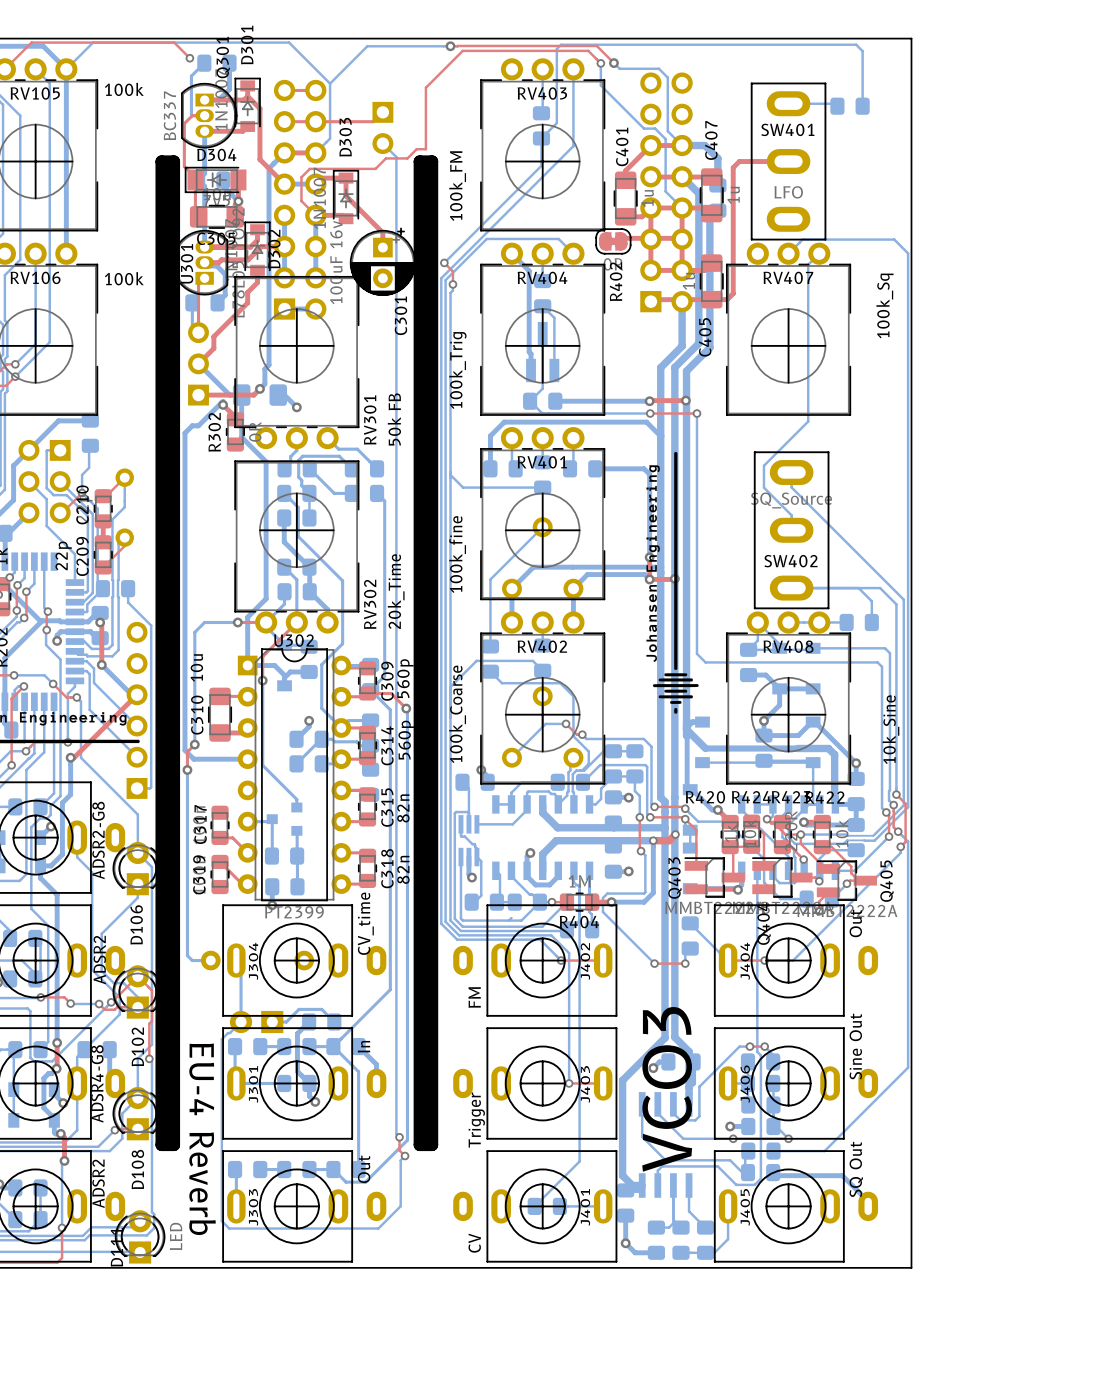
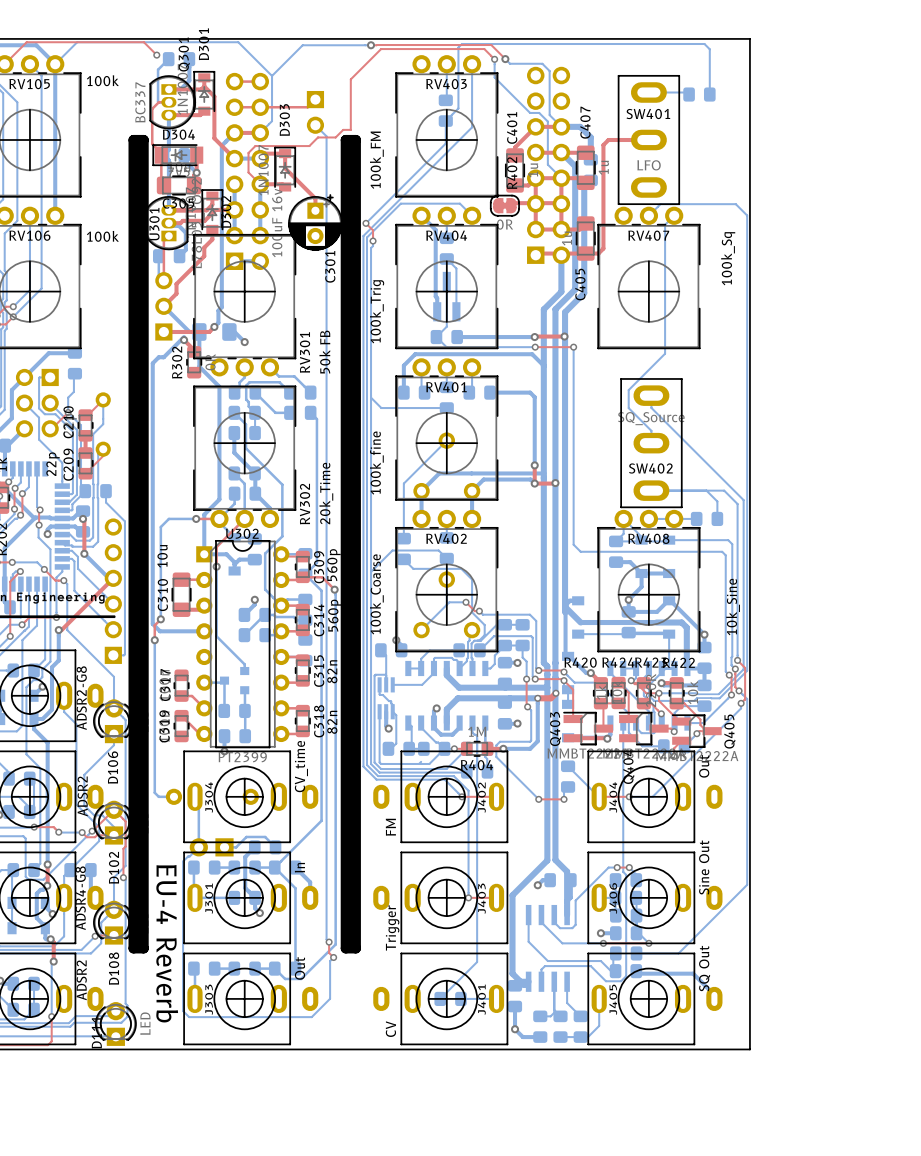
R402 name position: R402 (616, 281) -> R402 (512, 173)
drawing: [646, 452, 699, 714] -> none
text: VCO3 (667, 1089) -> none

